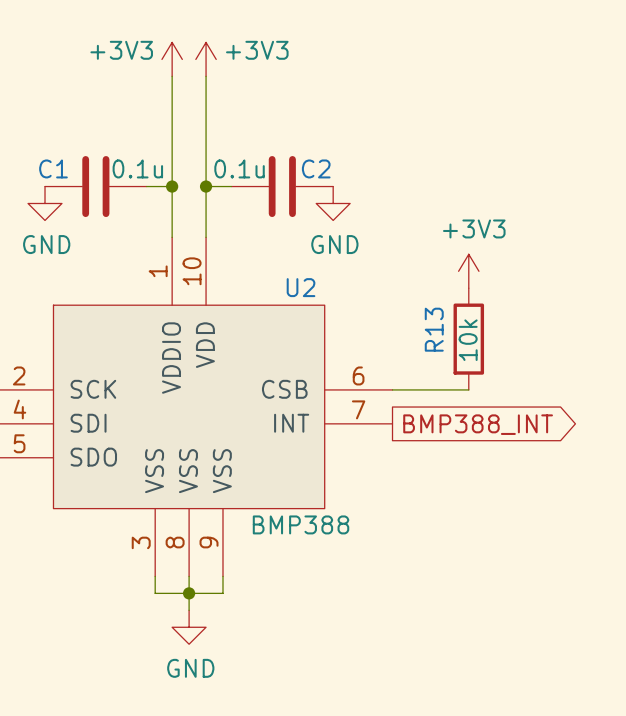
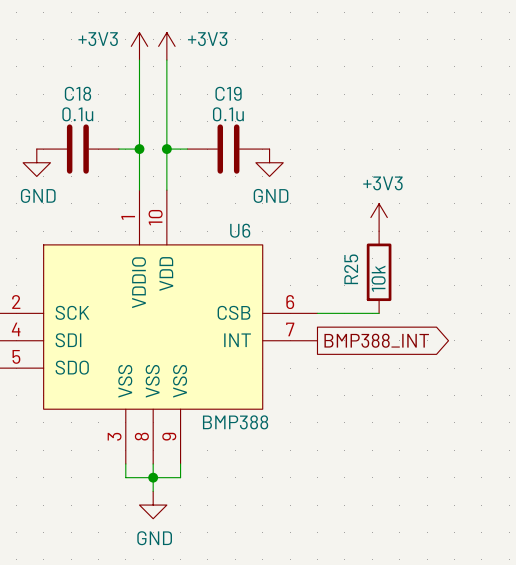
C1 name: C1 (53, 168) -> C18 (77, 93)
C1 value position: 0.1u (137, 168) -> 0.1u (77, 114)
C2 value position: 0.1u (239, 168) -> 0.1u (228, 114)
C2 name: C2 (316, 168) -> C19 (228, 93)
U2 name: U2 (301, 287) -> U6 (240, 230)
R13 name: R13 (434, 329) -> R25 (351, 269)

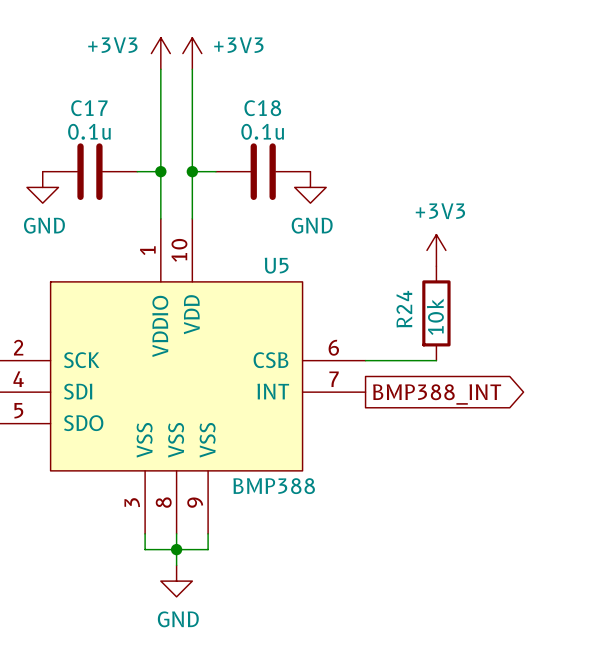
C18 name: C18 (77, 93) -> C17 (89, 108)
C19 name: C19 (228, 93) -> C18 (262, 108)
U6 name: U6 (240, 230) -> U5 (276, 265)
R25 name: R25 (351, 269) -> R24 (404, 309)

